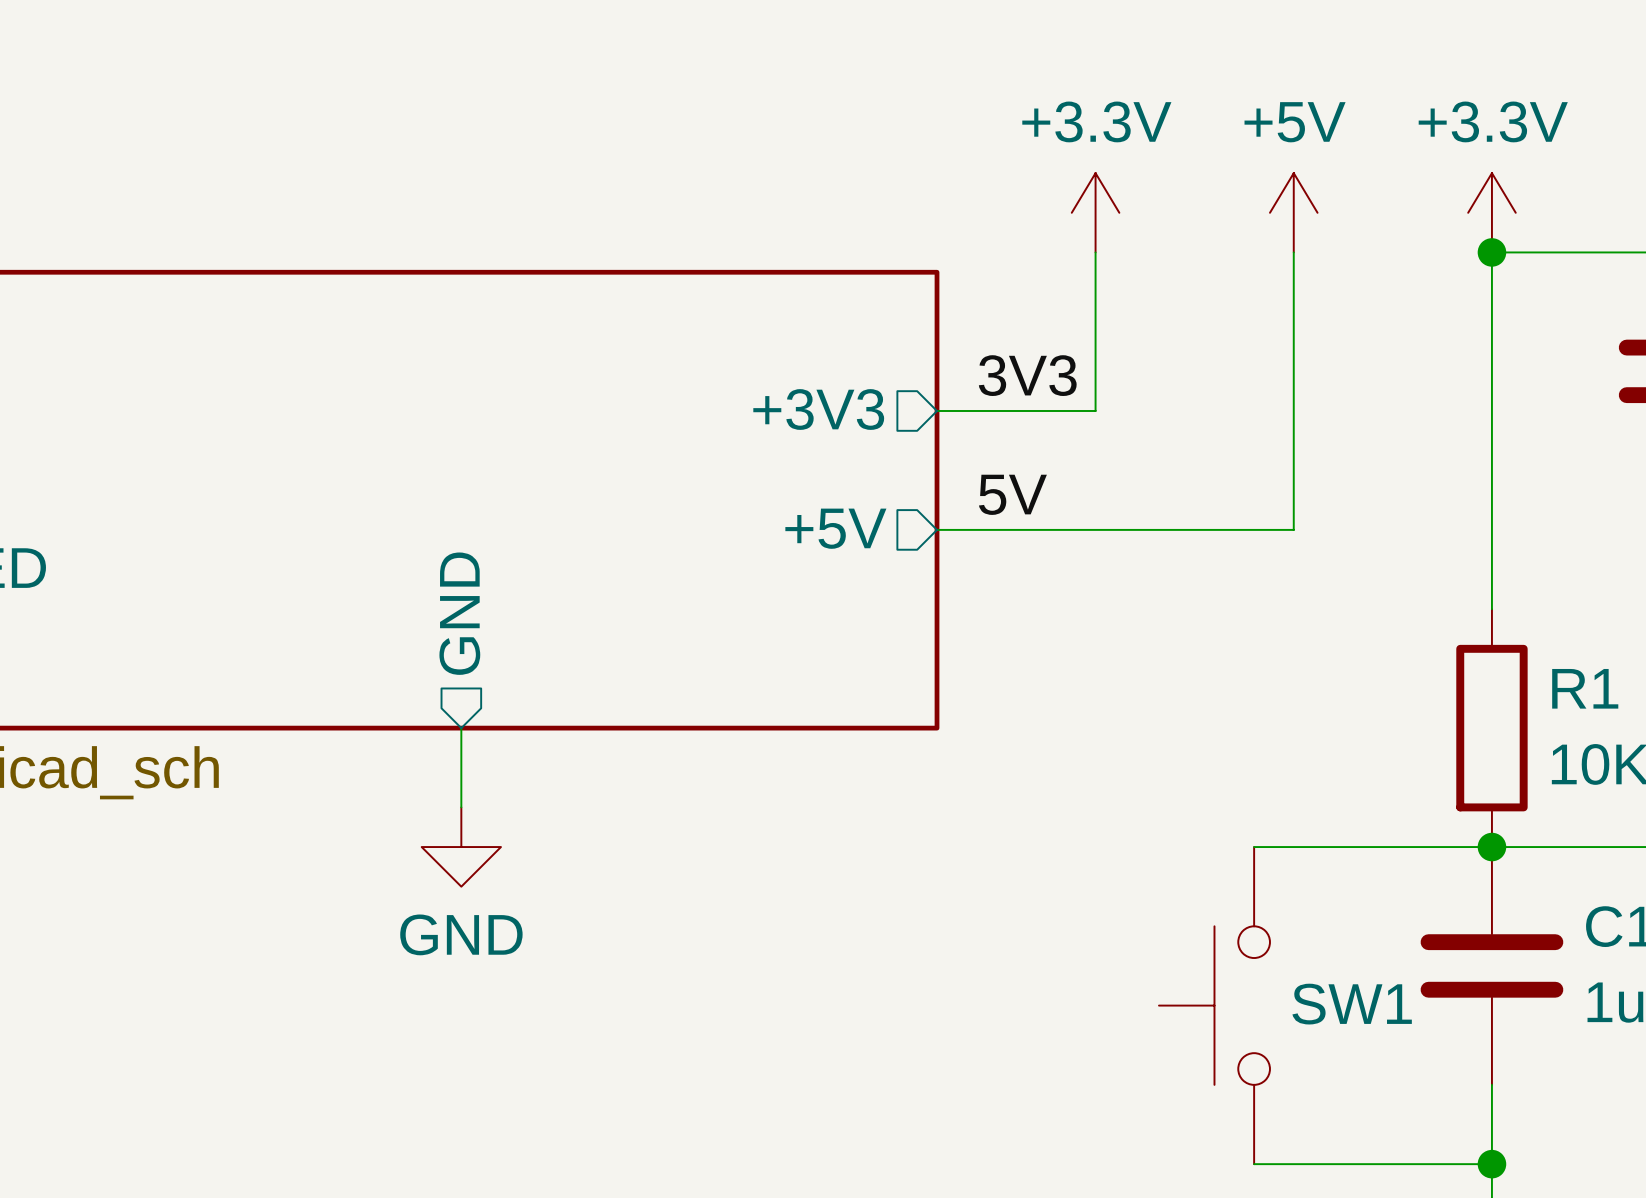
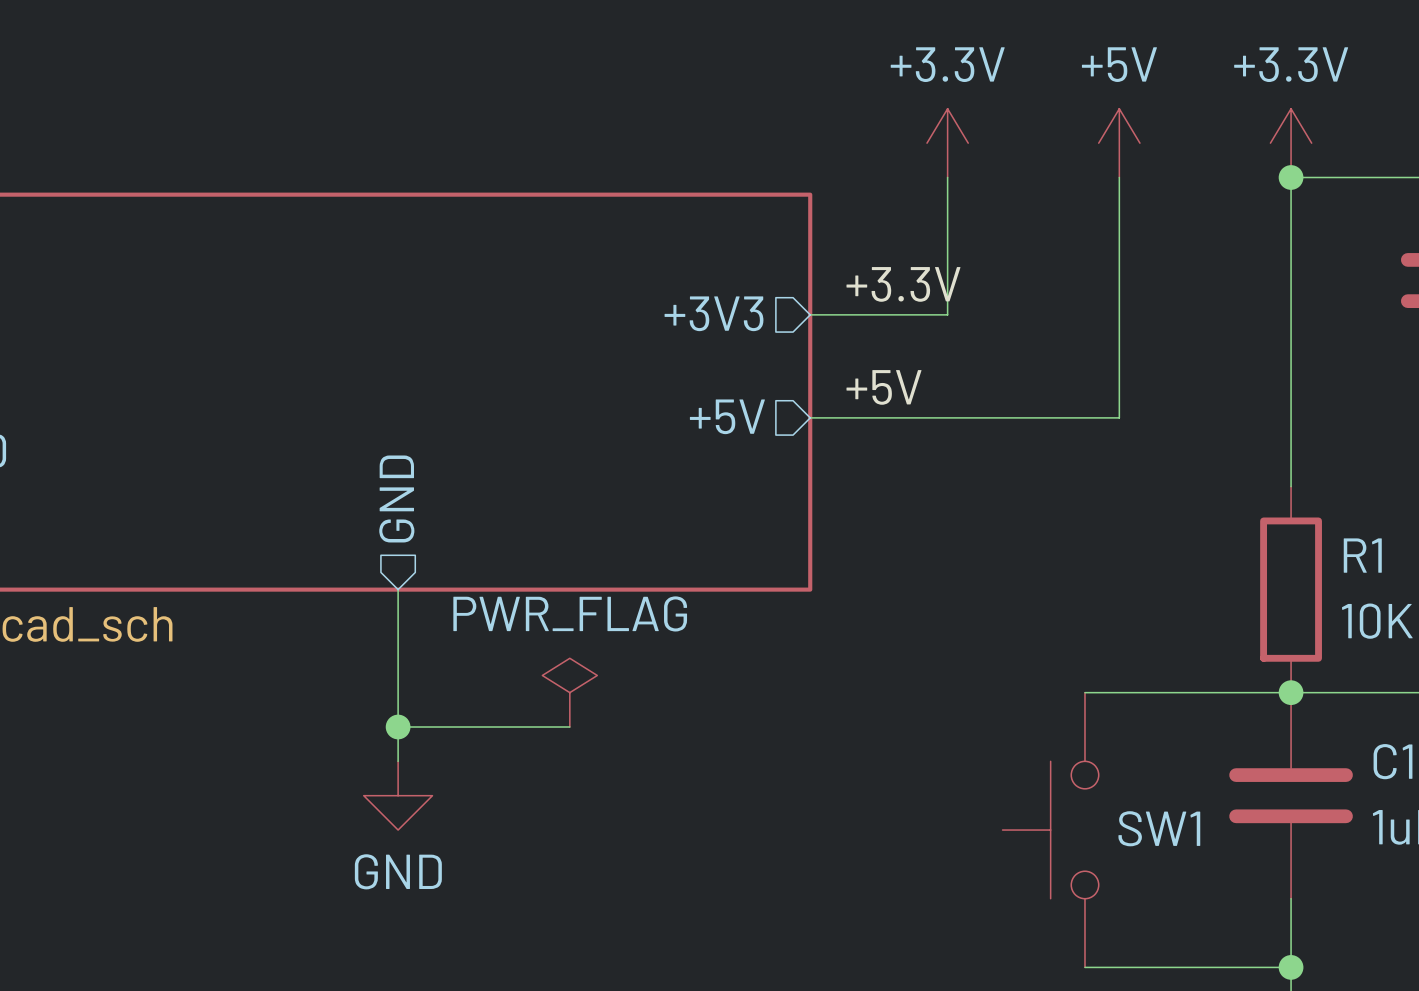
label: 3V3 (1027, 375) -> +3.3V (903, 284)
label: 5V (1012, 494) -> +5V (884, 387)
wire: none -> (398, 658) (398, 761)
power symbol position: GND (461, 847) -> GND (398, 795)
power symbol: none -> PWR_FLAG (569, 692)
wire: none -> (398, 727) (569, 727)
junction: none -> (398, 727)

